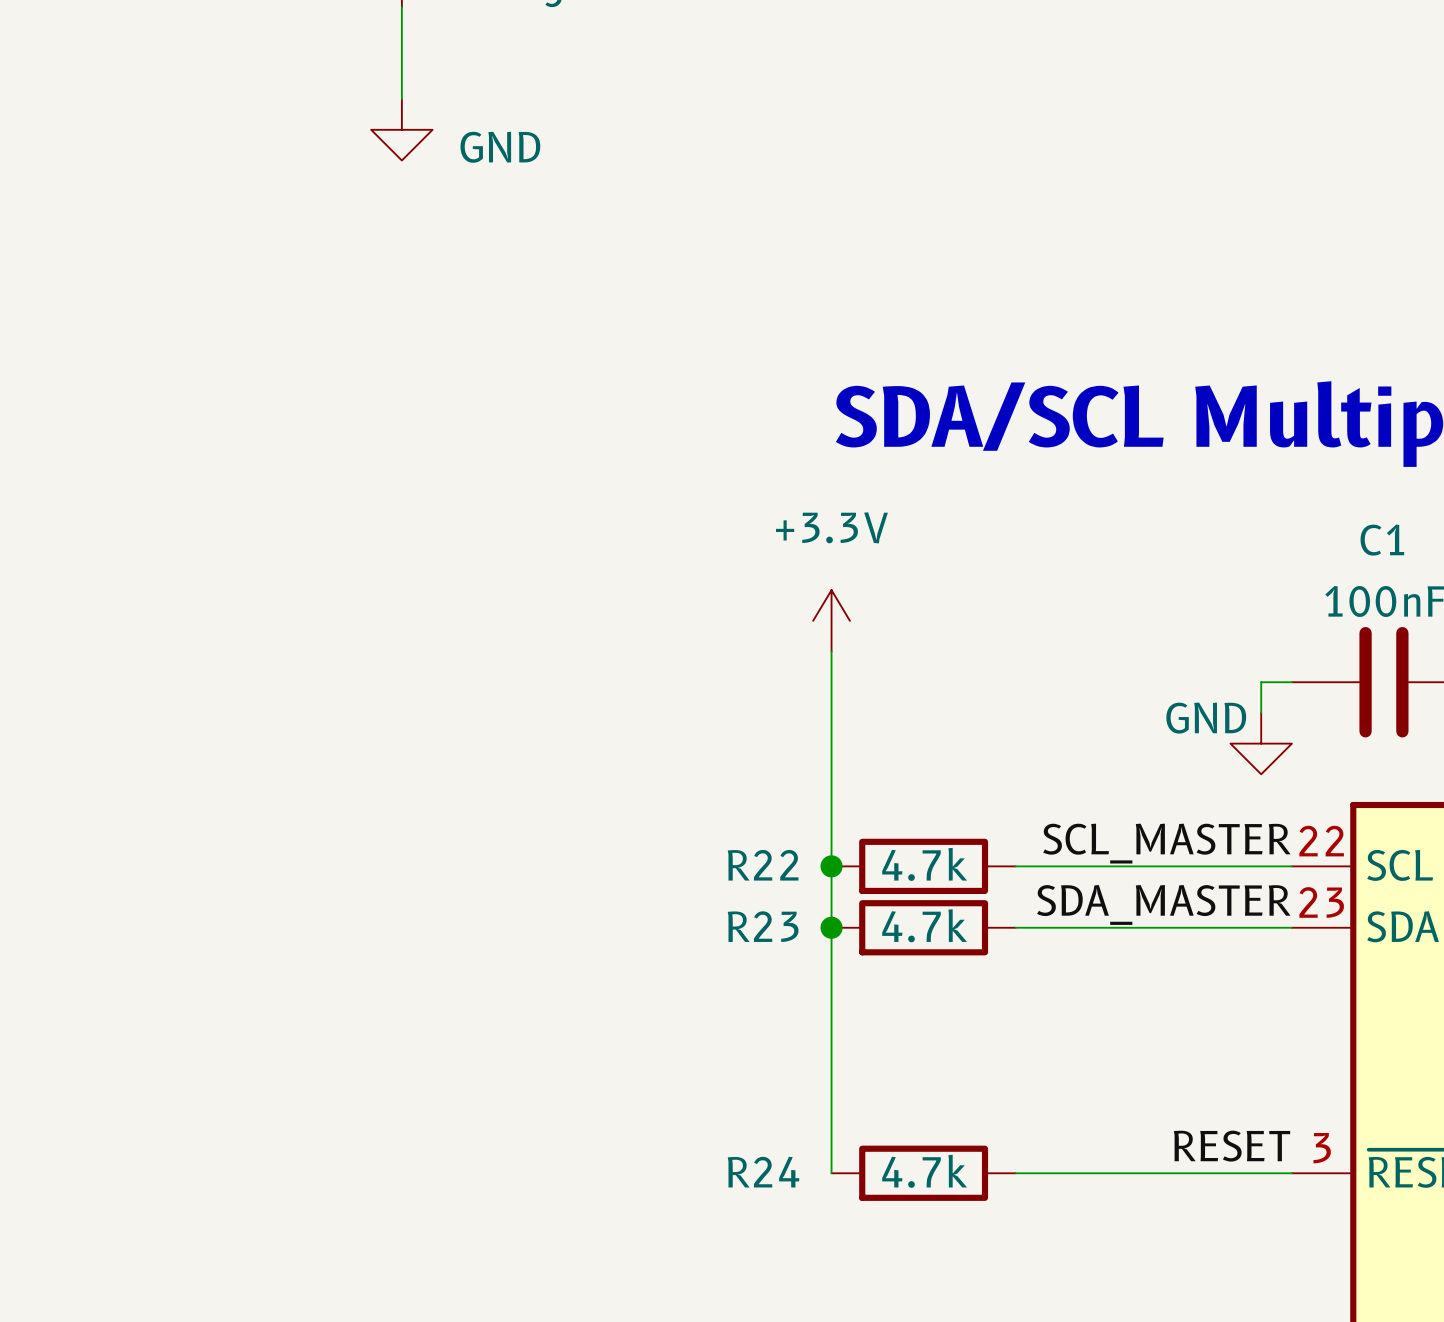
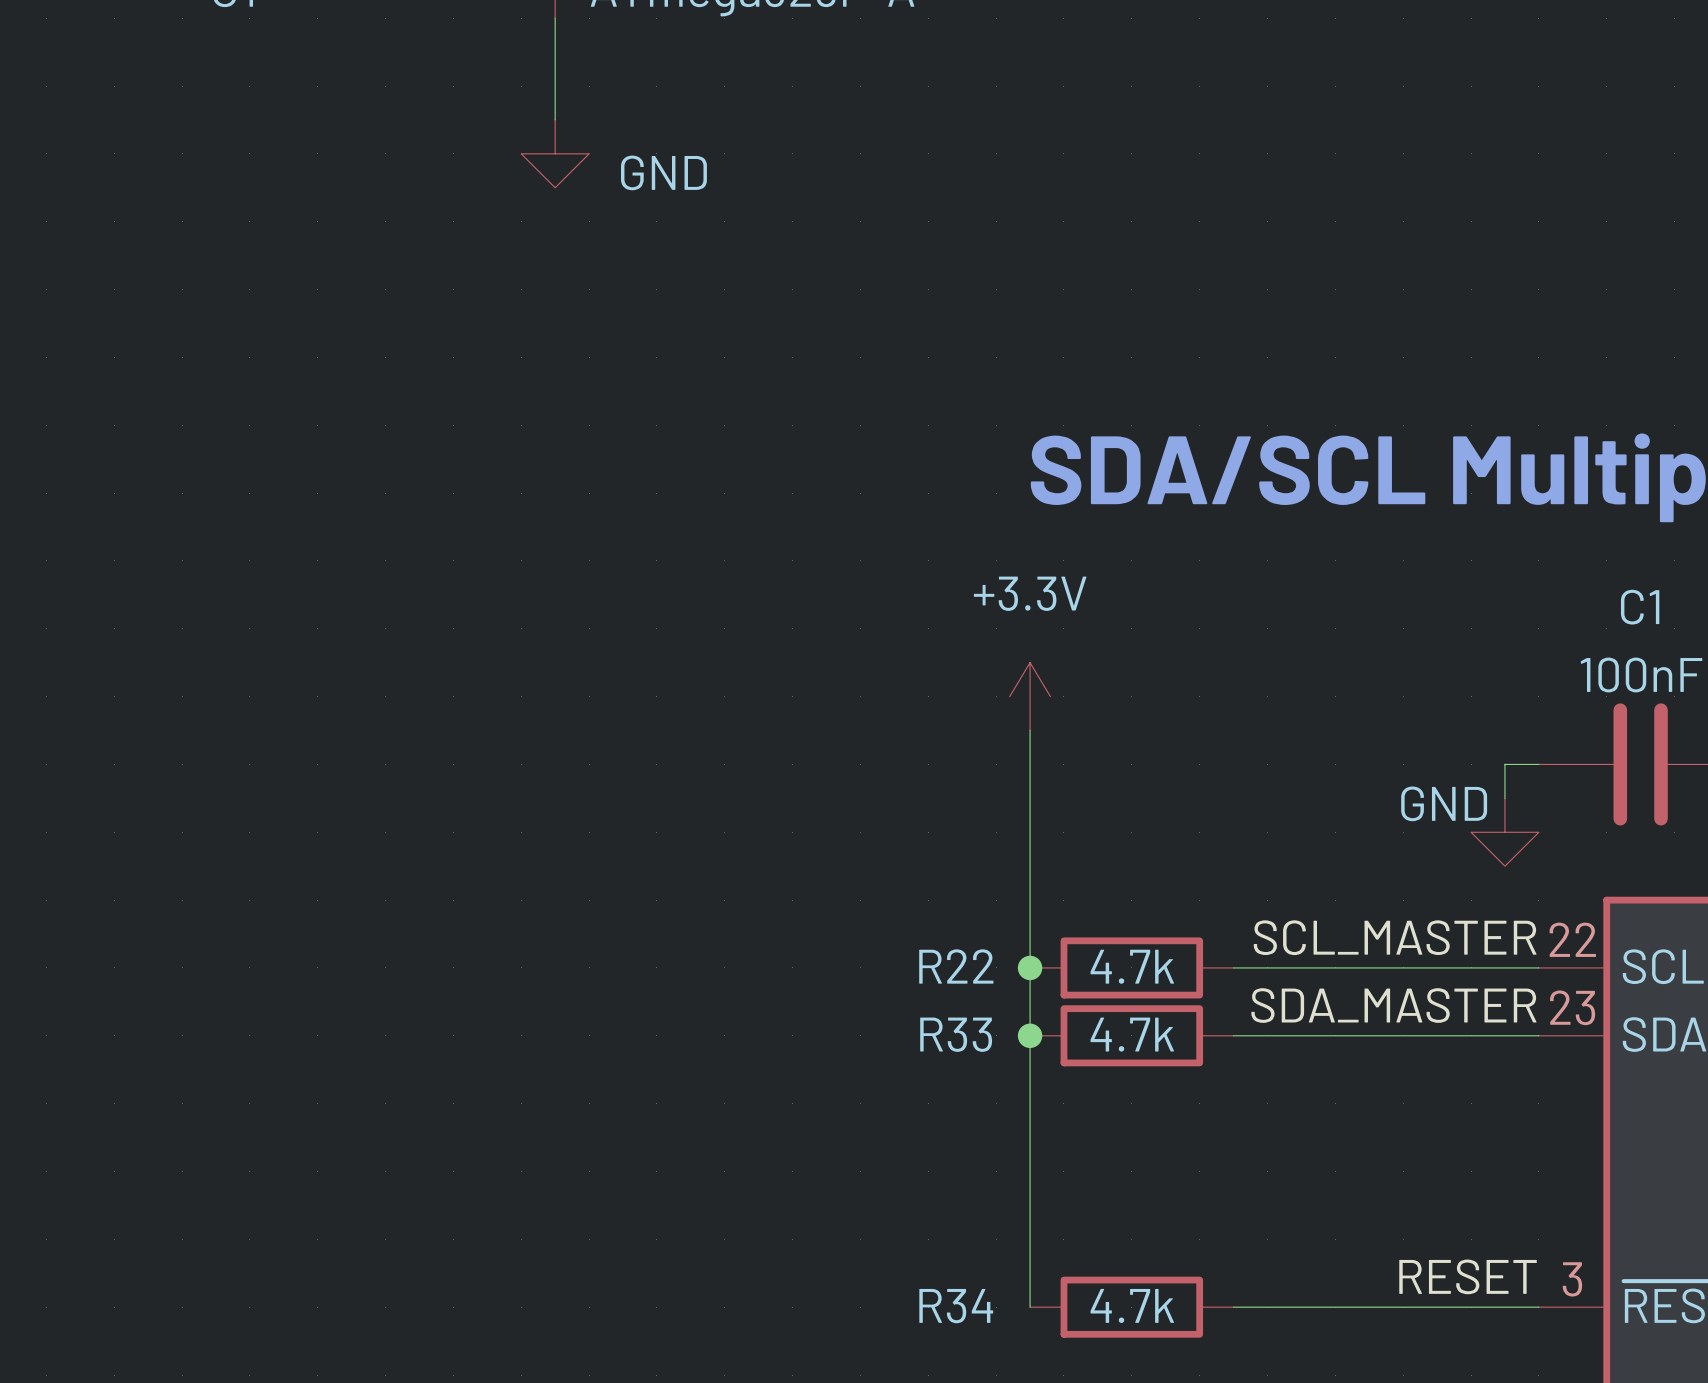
R23 name: R23 (763, 926) -> R33 (956, 1034)
R24 name: R24 (763, 1172) -> R34 (956, 1306)

